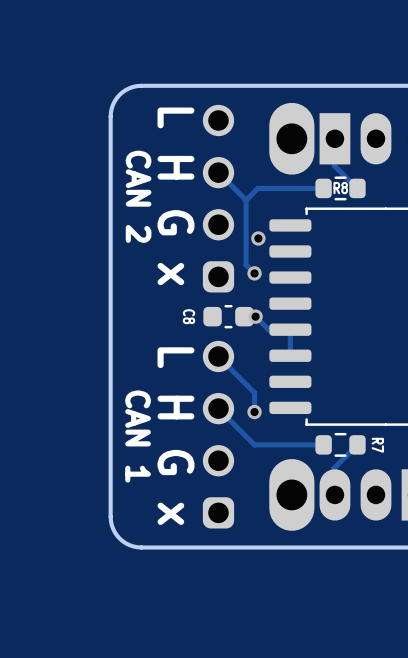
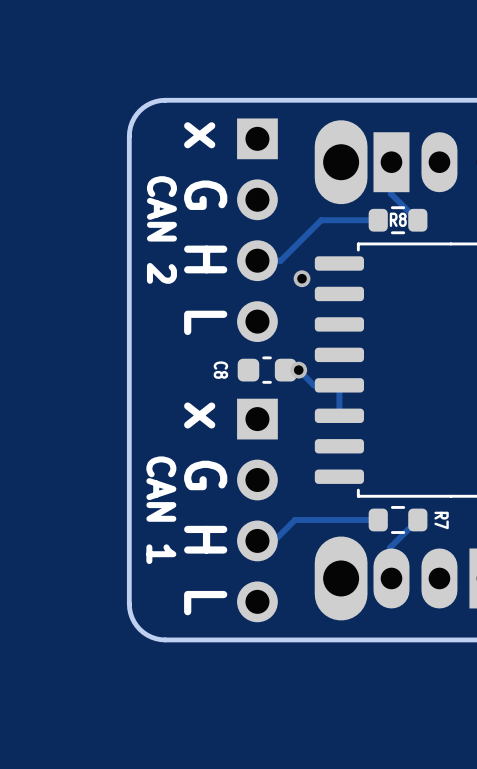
part footprint: [202, 104, 235, 293] -> [237, 118, 278, 343]
track: (218, 172) (246, 200) -> none
track: (274, 188) (257, 188) (246, 200) -> (321, 220) (280, 260) (257, 260)
text: L H G x (175, 196) -> x G H L (205, 228)
track: (246, 200) (246, 264) (254, 273) -> none
via: (254, 273) -> none
part footprint: [202, 340, 235, 529] -> [237, 398, 278, 623]
track: (220, 358) (254, 392) (254, 412) -> none
track: (220, 410) (254, 444) -> (257, 543) (271, 543) (295, 519) (297, 519)
via: (254, 412) -> none
text: L H G x (175, 436) -> x G H L (205, 508)

